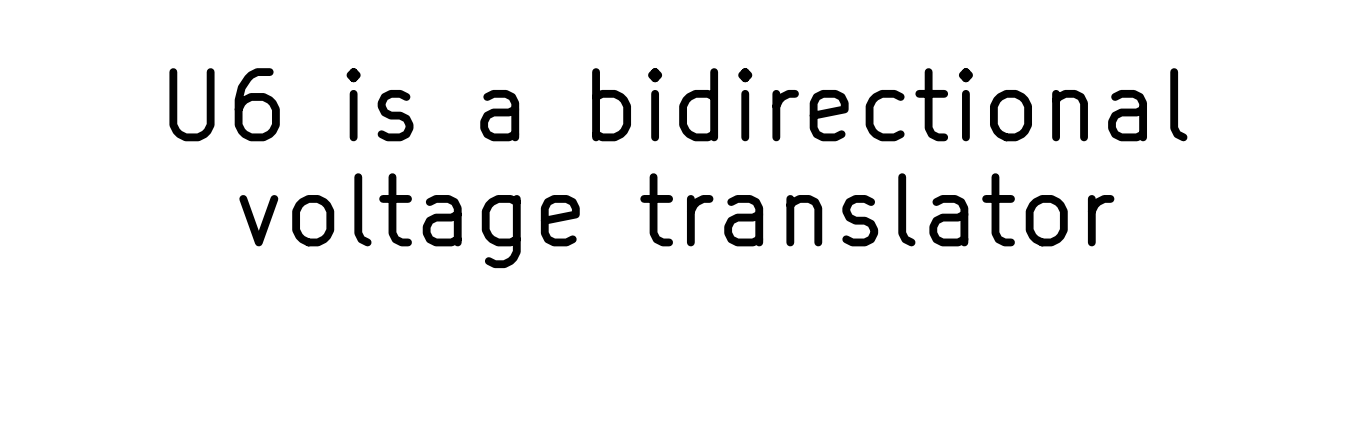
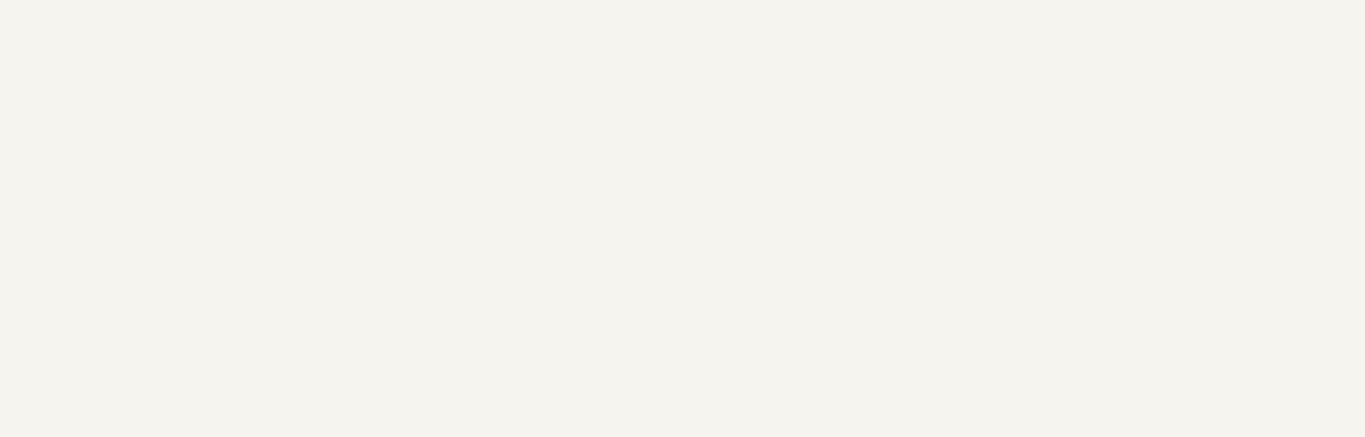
text: U6 is a bidirectional (678, 104) -> none
text: voltage translator (676, 220) -> none

